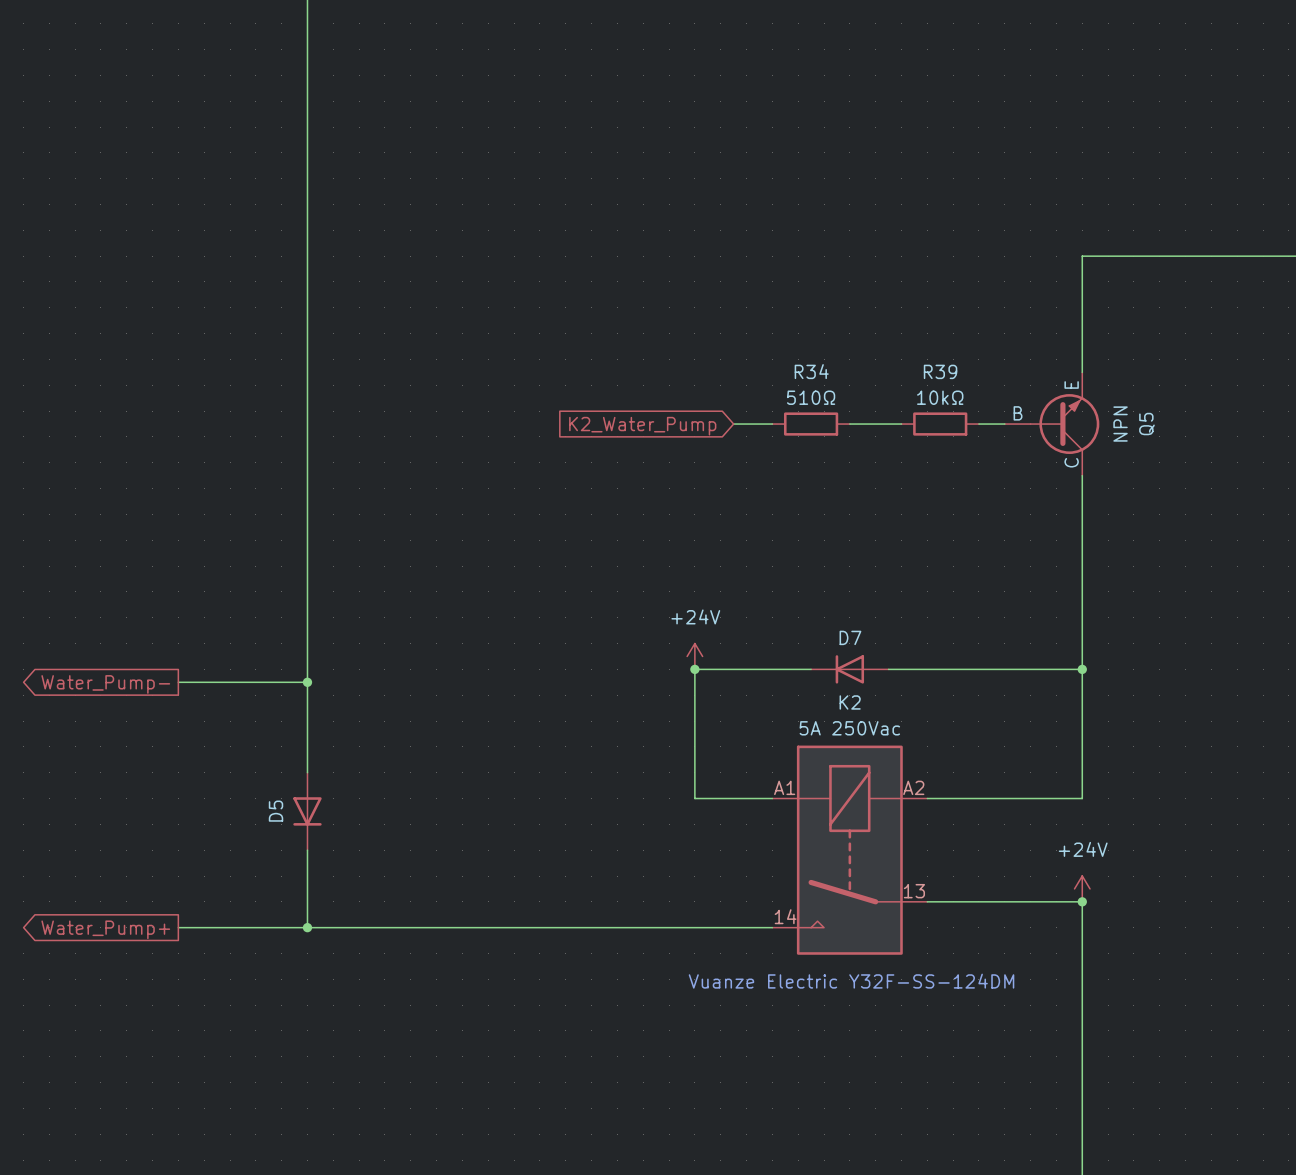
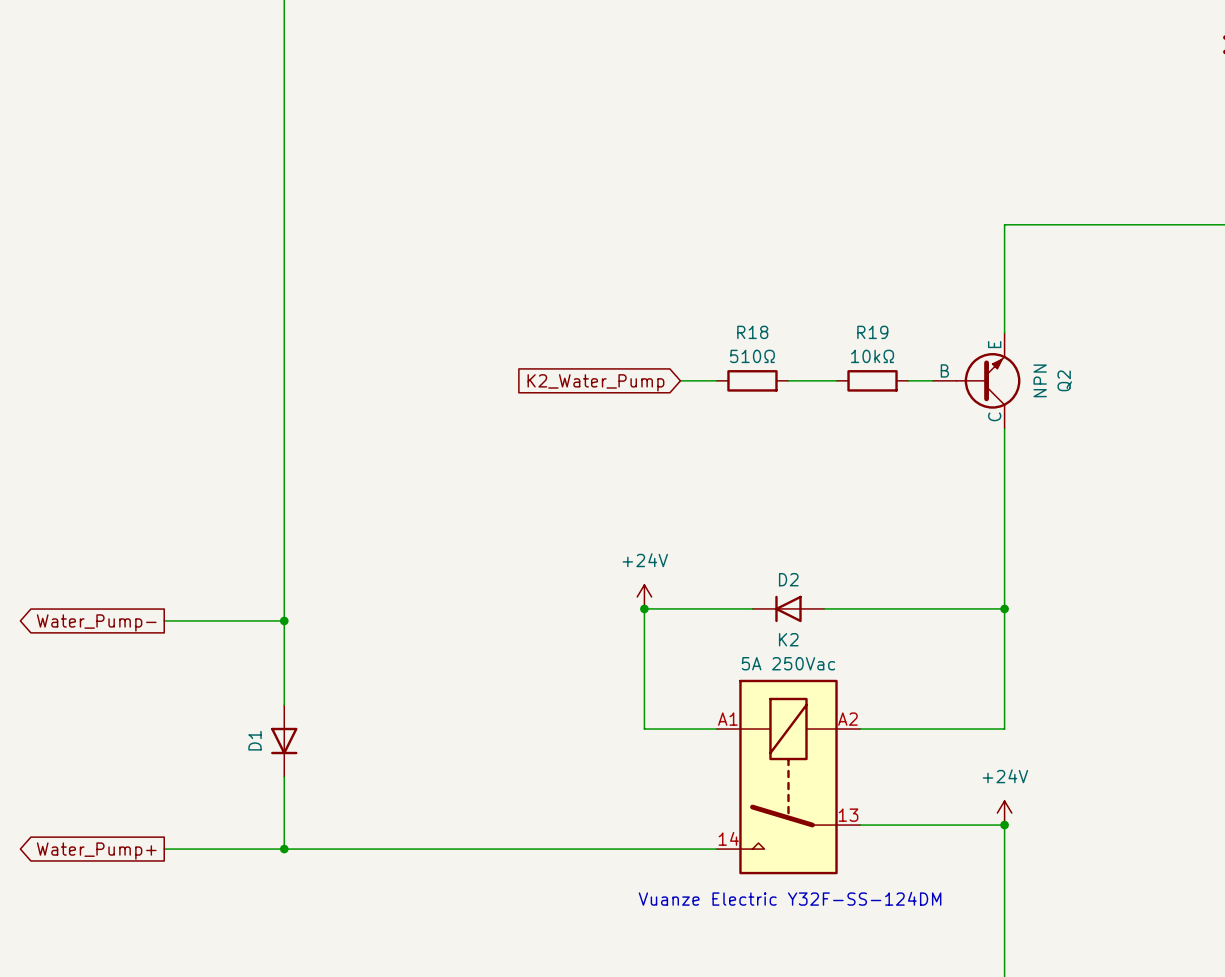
R34 name: R34 (811, 371) -> R18 (752, 332)
R39 name: R39 (940, 371) -> R19 (872, 332)
Q5 name: Q5 (1146, 424) -> Q2 (1064, 380)
D7 name: D7 (850, 637) -> D2 (788, 579)
D5 name: D5 (276, 811) -> D1 (255, 740)

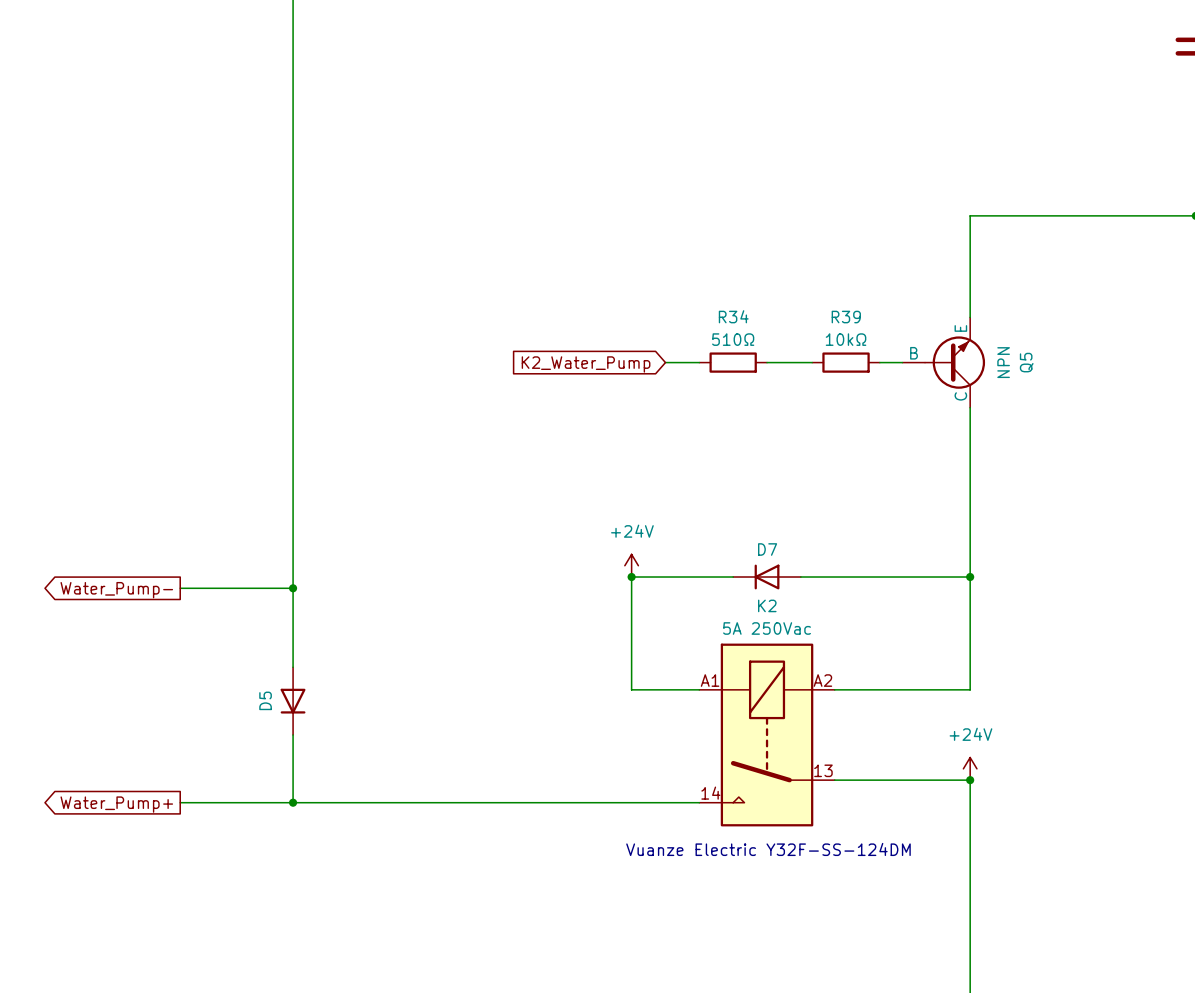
R18 name: R18 (752, 332) -> R34 (733, 316)
R19 name: R19 (872, 332) -> R39 (846, 317)
Q2 name: Q2 (1064, 380) -> Q5 (1026, 362)
D2 name: D2 (788, 579) -> D7 (767, 549)
D1 name: D1 (255, 740) -> D5 (265, 700)

